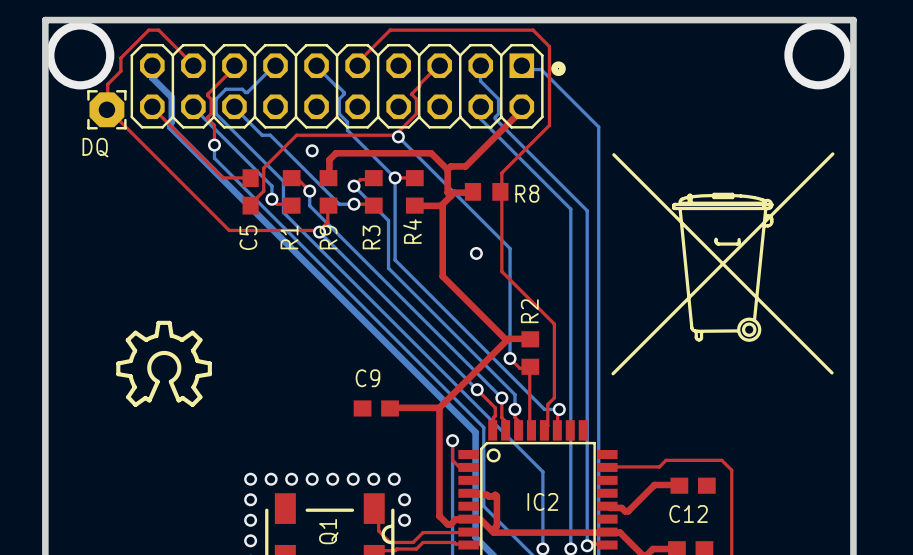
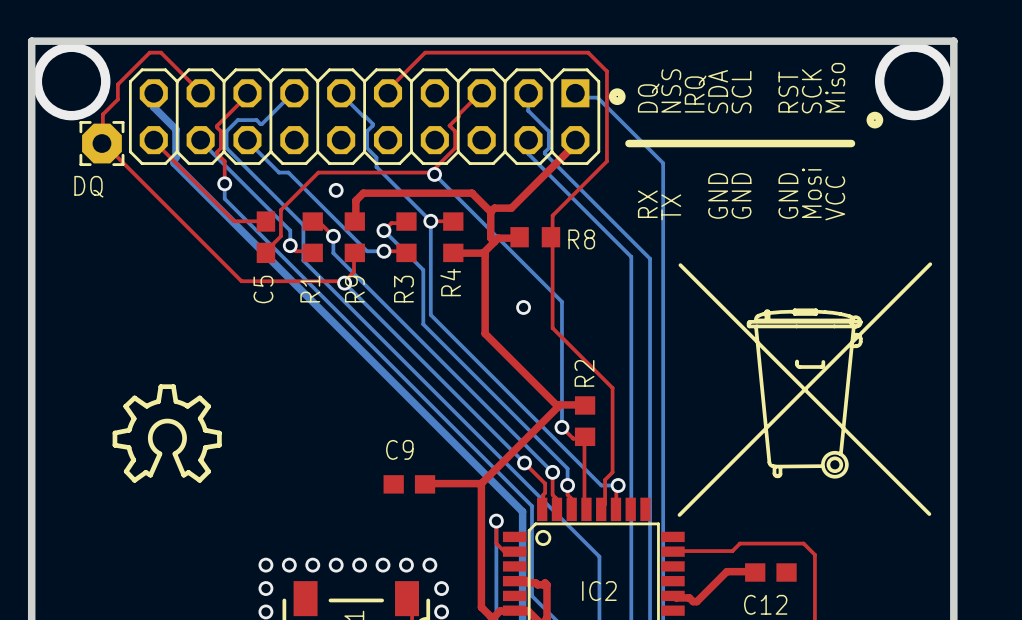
text: none -> Miso (835, 87)
text: none -> NSS (671, 90)
text: none -> SDA (718, 91)
text: none -> SCL (741, 92)
text: none -> RST (788, 92)
text: none -> SCK (811, 91)
text: none -> IRQ (695, 94)
text: none -> DQ (648, 98)
drawing: none -> [866, 111, 884, 129]
line: none -> (628, 143) (851, 143)
text: none -> Mosi (811, 193)
text: none -> GND (718, 195)
text: none -> GND (741, 195)
text: none -> GND (788, 195)
text: none -> VCC (835, 198)
text: none -> RX (647, 204)
text: none -> TX (671, 207)
drawing position: (722, 263) -> (804, 389)

